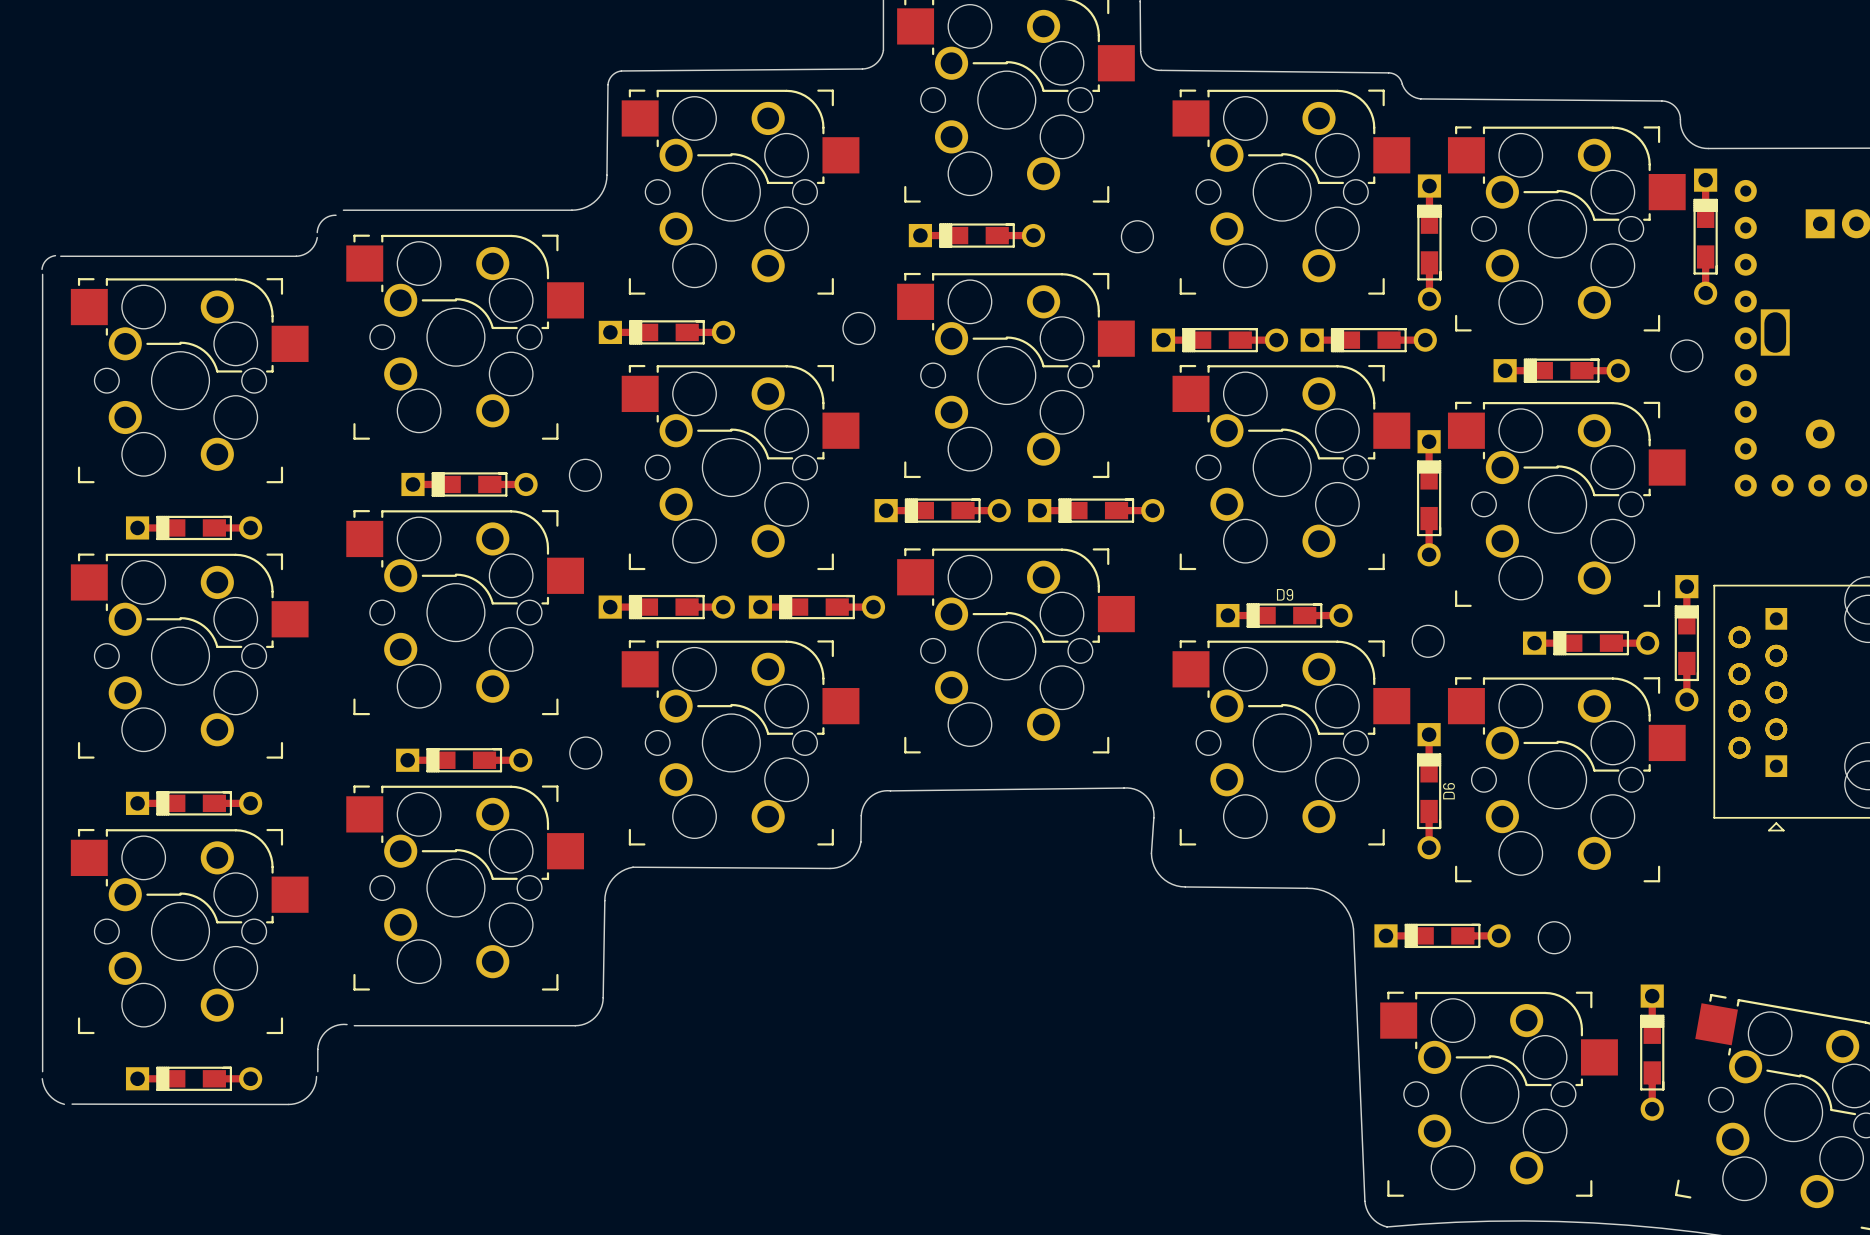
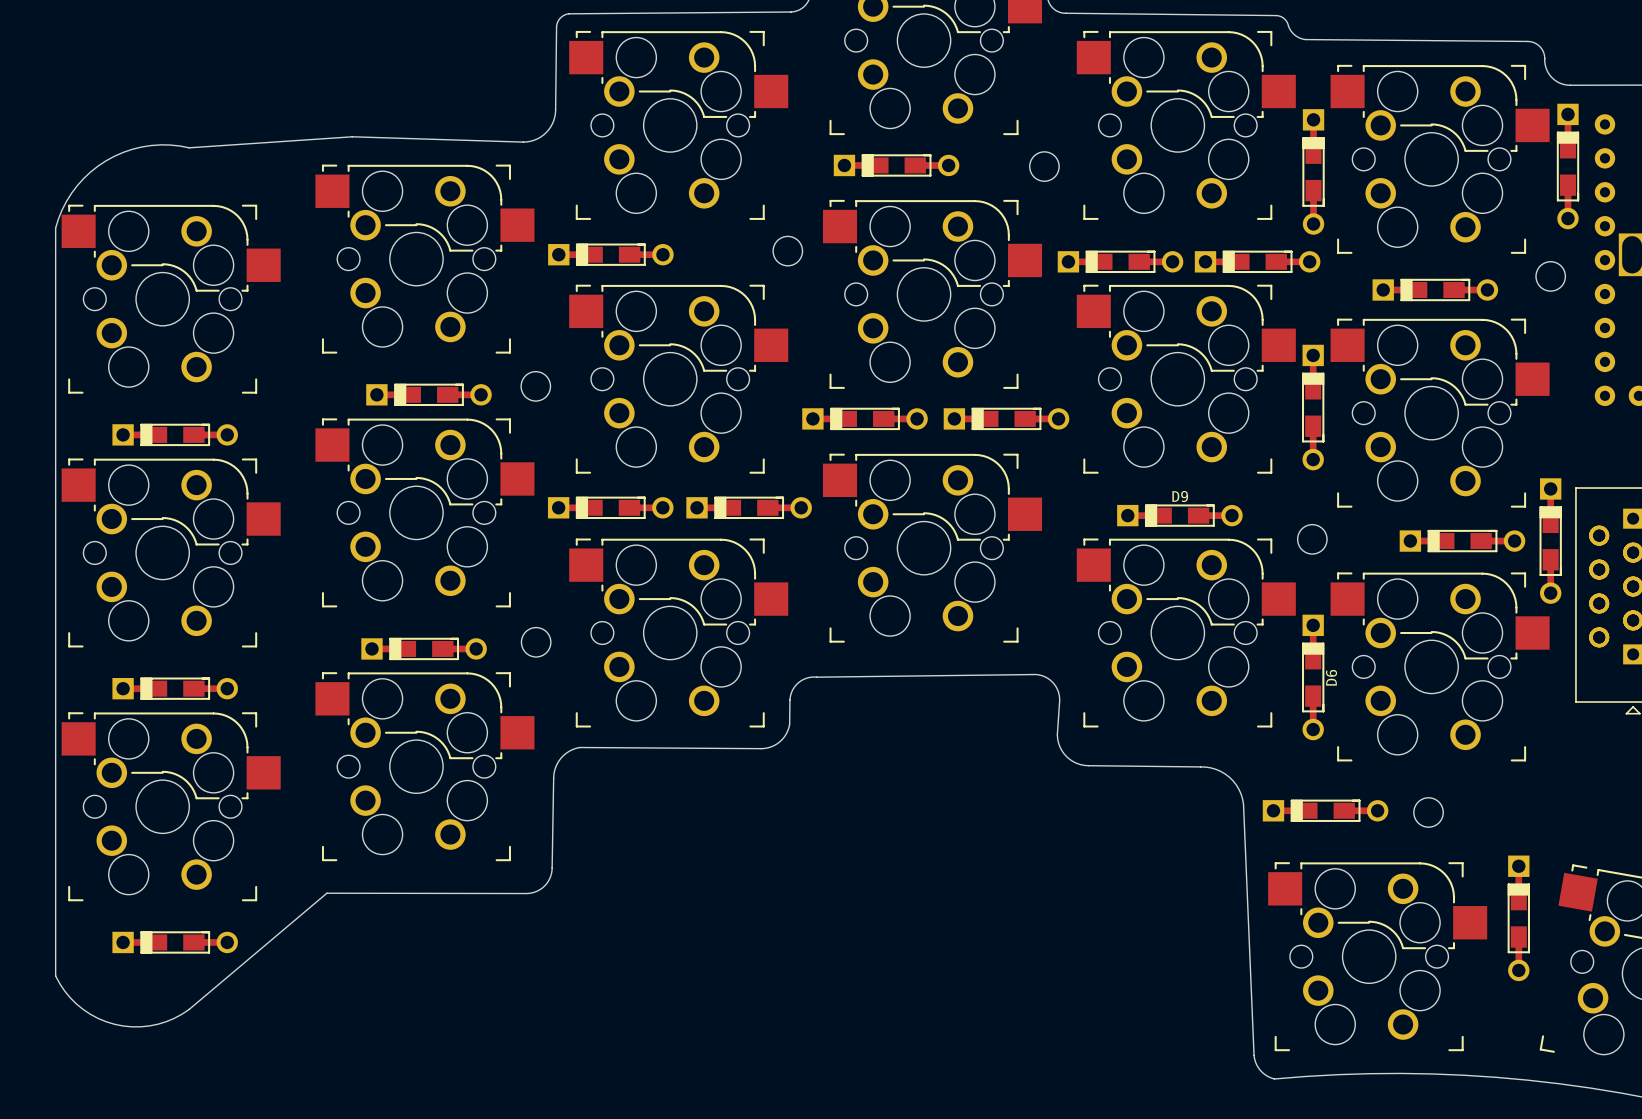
board edge: (343, 210) (571, 210) -> none
board edge: (336, 215) (323, 220) (317, 232) -> none
board edge: (317, 237) (310, 250) (296, 256) (60, 256) -> none
board edge: (55, 255) (46, 260) (42, 269) -> none
board edge: (42, 274) (42, 1071) -> none
board edge: (347, 1024) (332, 1027) (321, 1037) (317, 1049) (317, 1071) -> none
board edge: (354, 1025) (575, 1025) -> (523, 142) (352, 136) (189, 147) (170, 145) (151, 145) (132, 149) (106, 160) (83, 178) (66, 201) (55, 227) (55, 975) (64, 990) (76, 1003) (98, 1018) (123, 1025) (149, 1025) (166, 1021) (189, 1009) (326, 893) (526, 893)
board edge: (316, 1076) (314, 1085) (310, 1093) (303, 1100) (291, 1104) (72, 1104) -> none
board edge: (42, 1078) (49, 1095) (64, 1104) -> none

